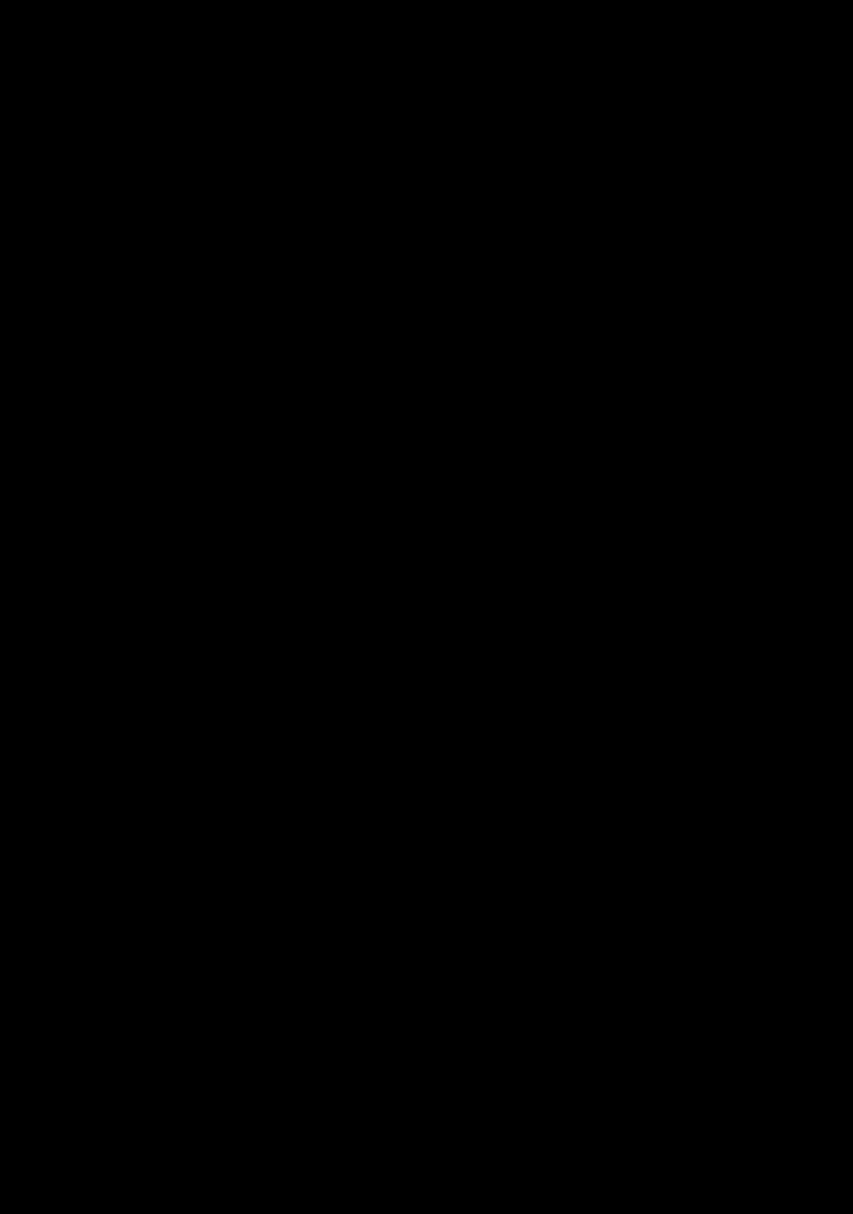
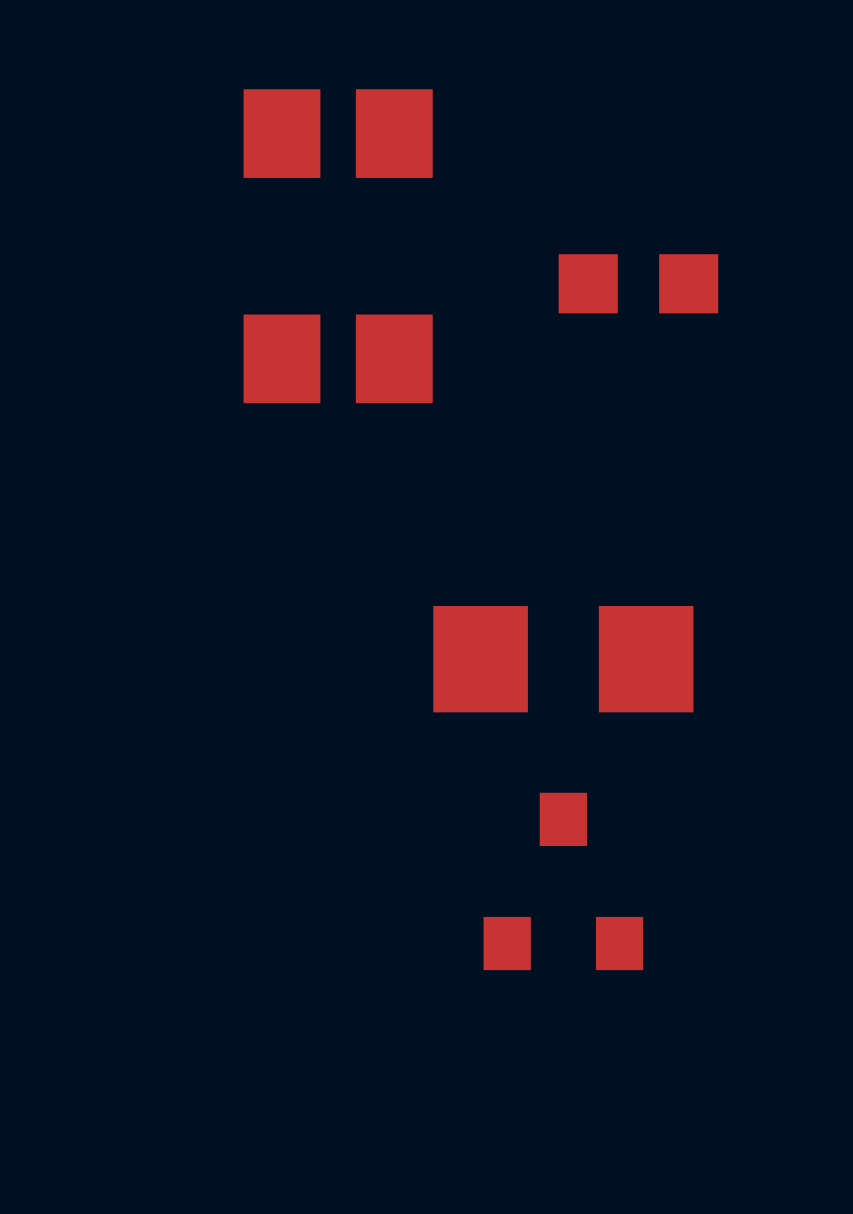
part: none -> (338, 133)
part: none -> (638, 283)
part: none -> (338, 358)
part: none -> (563, 659)
part: none -> (563, 881)

